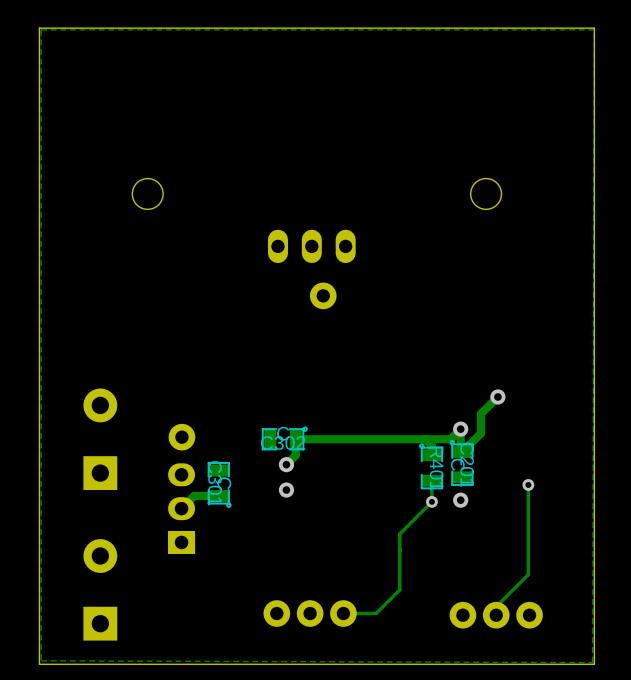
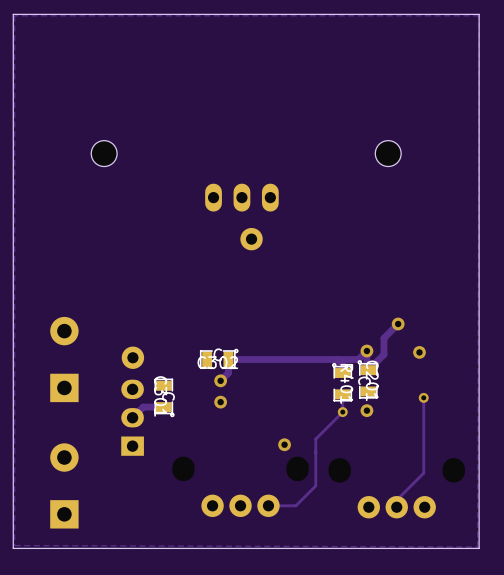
via: none -> (419, 352)
via: none -> (284, 444)

